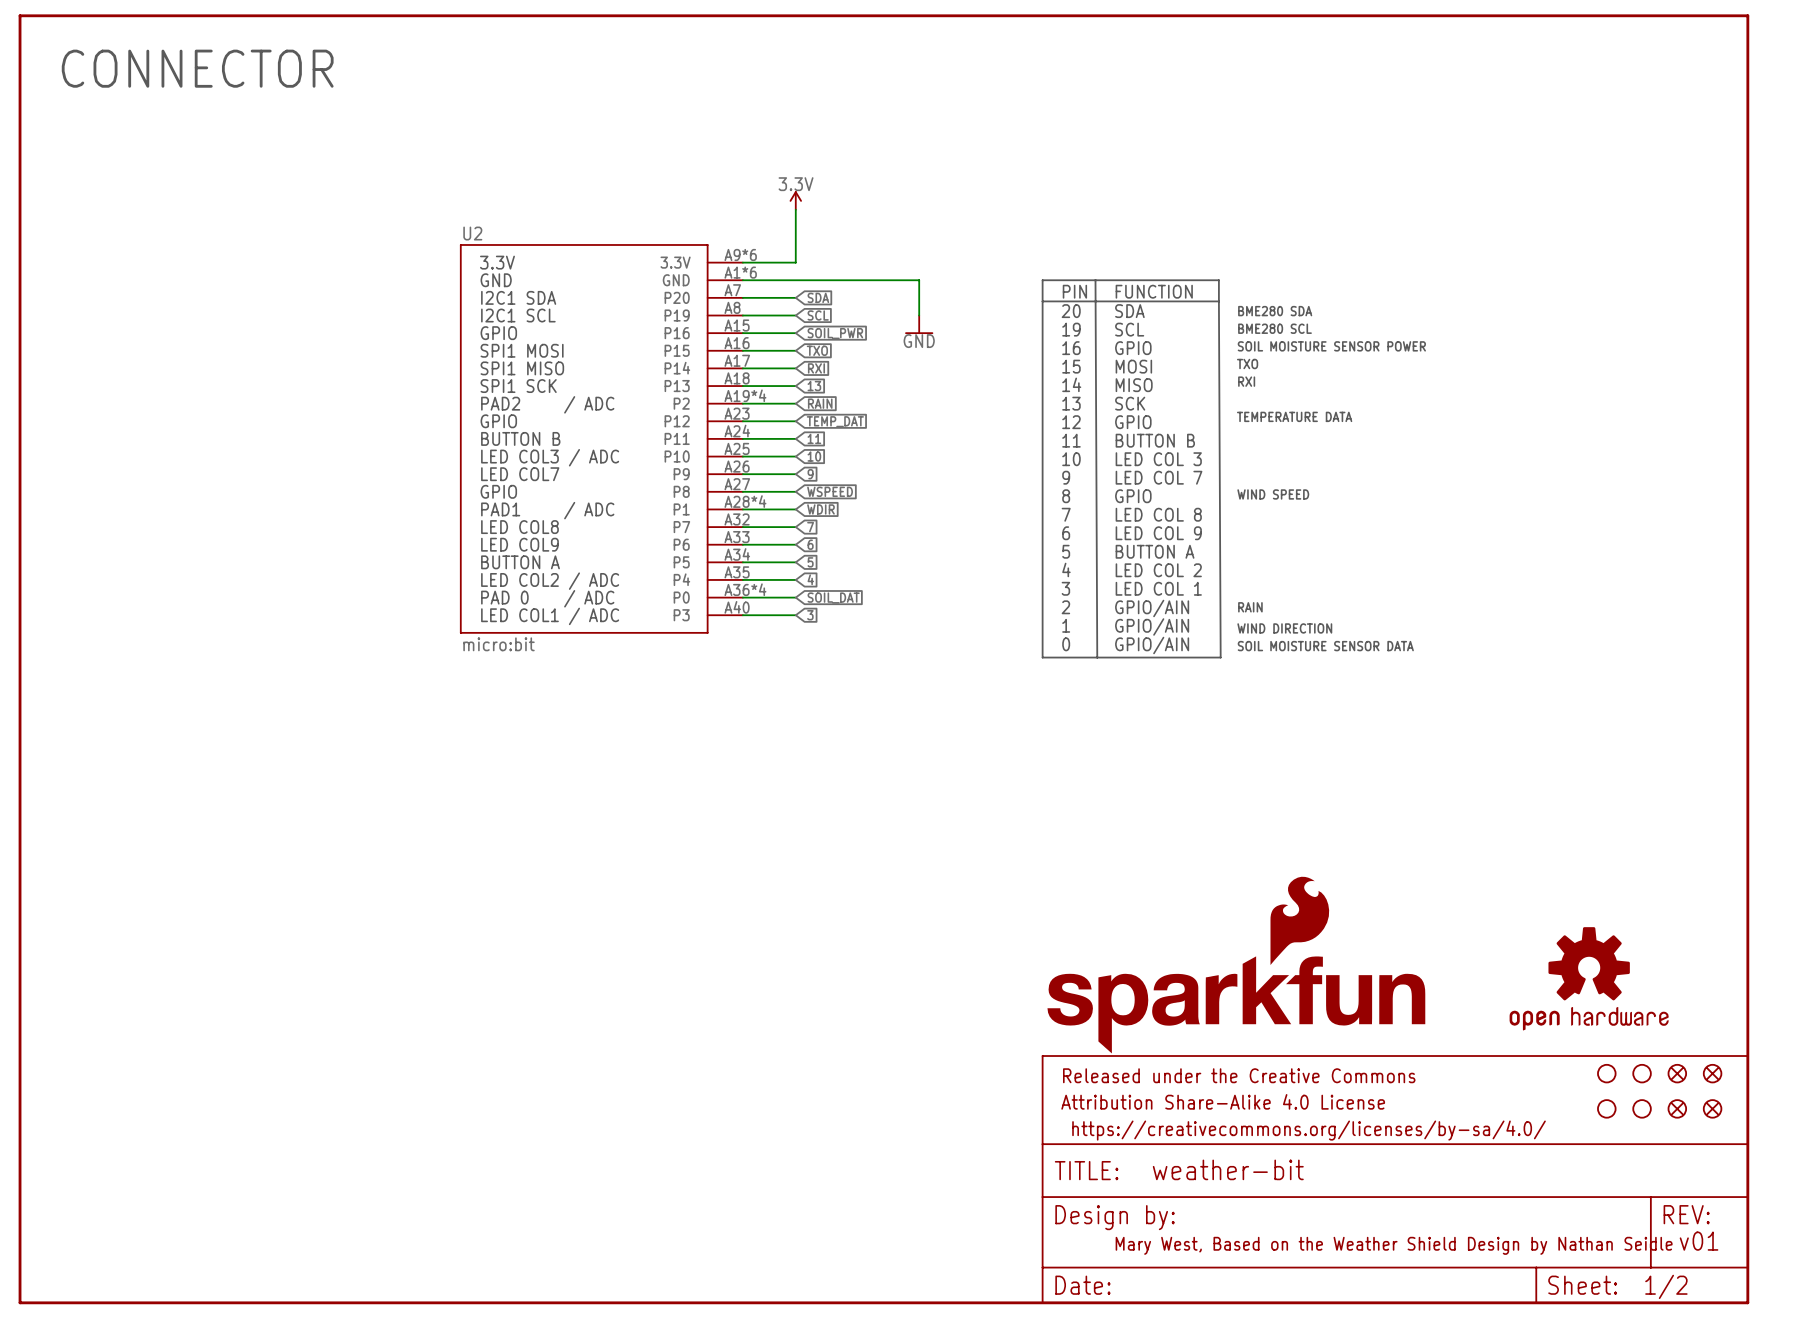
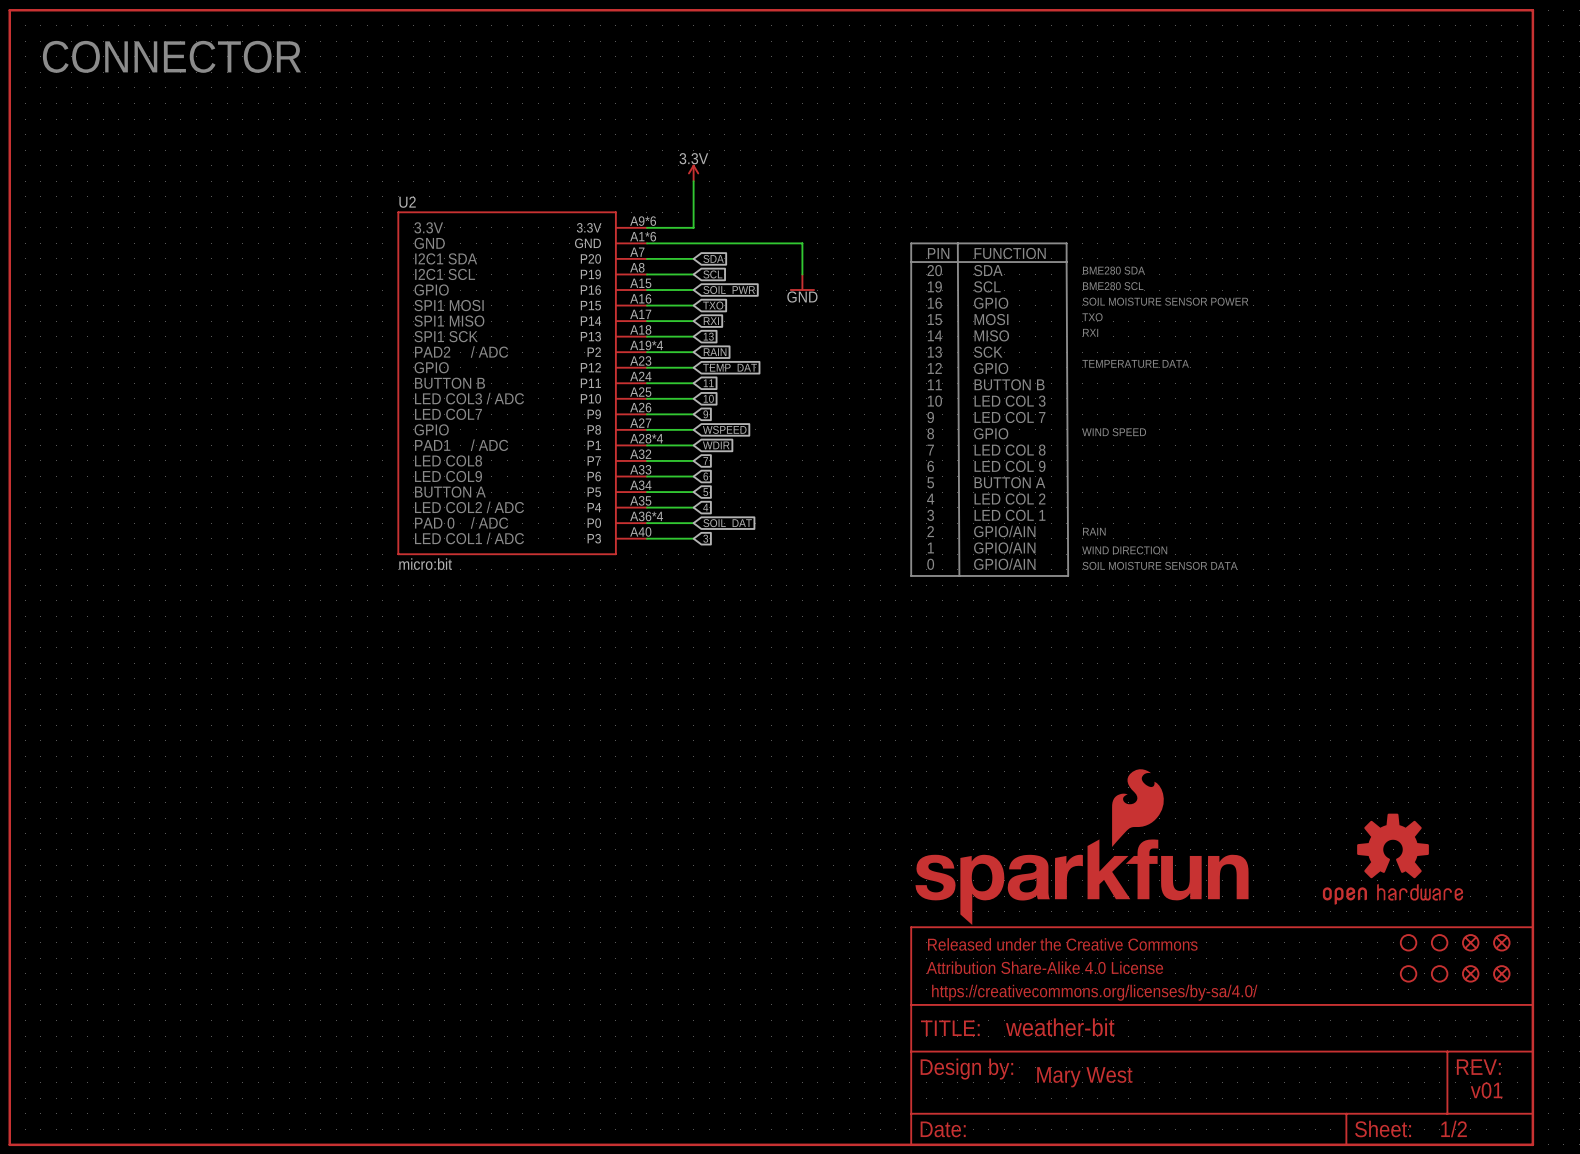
text: none -> Mary West (1084, 1077)
text: Mary West, Based on the Weather Shield Design by Nathan Seidle (1394, 1245) -> none

